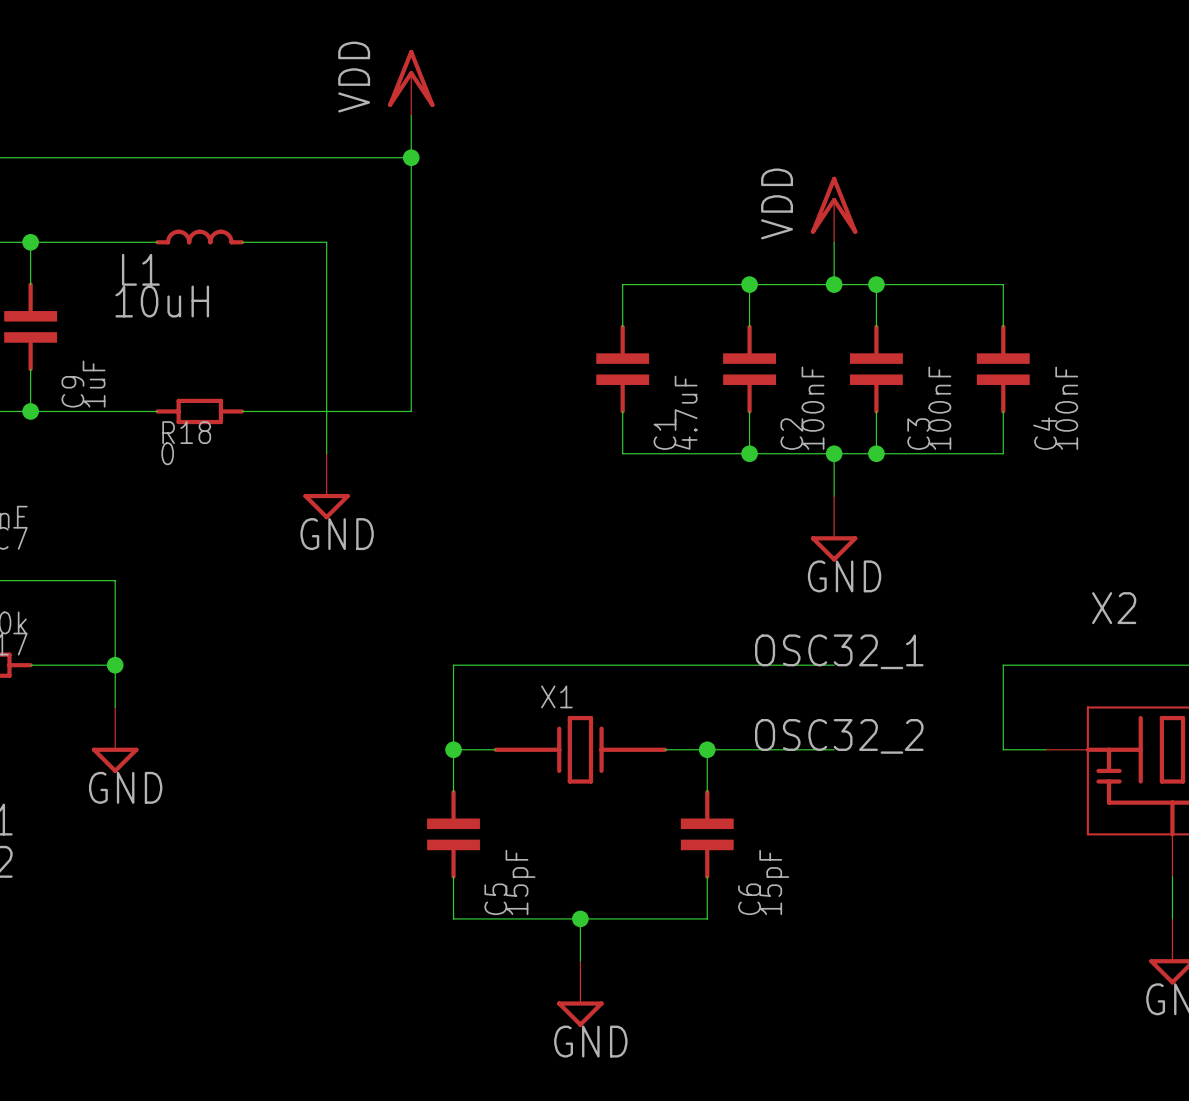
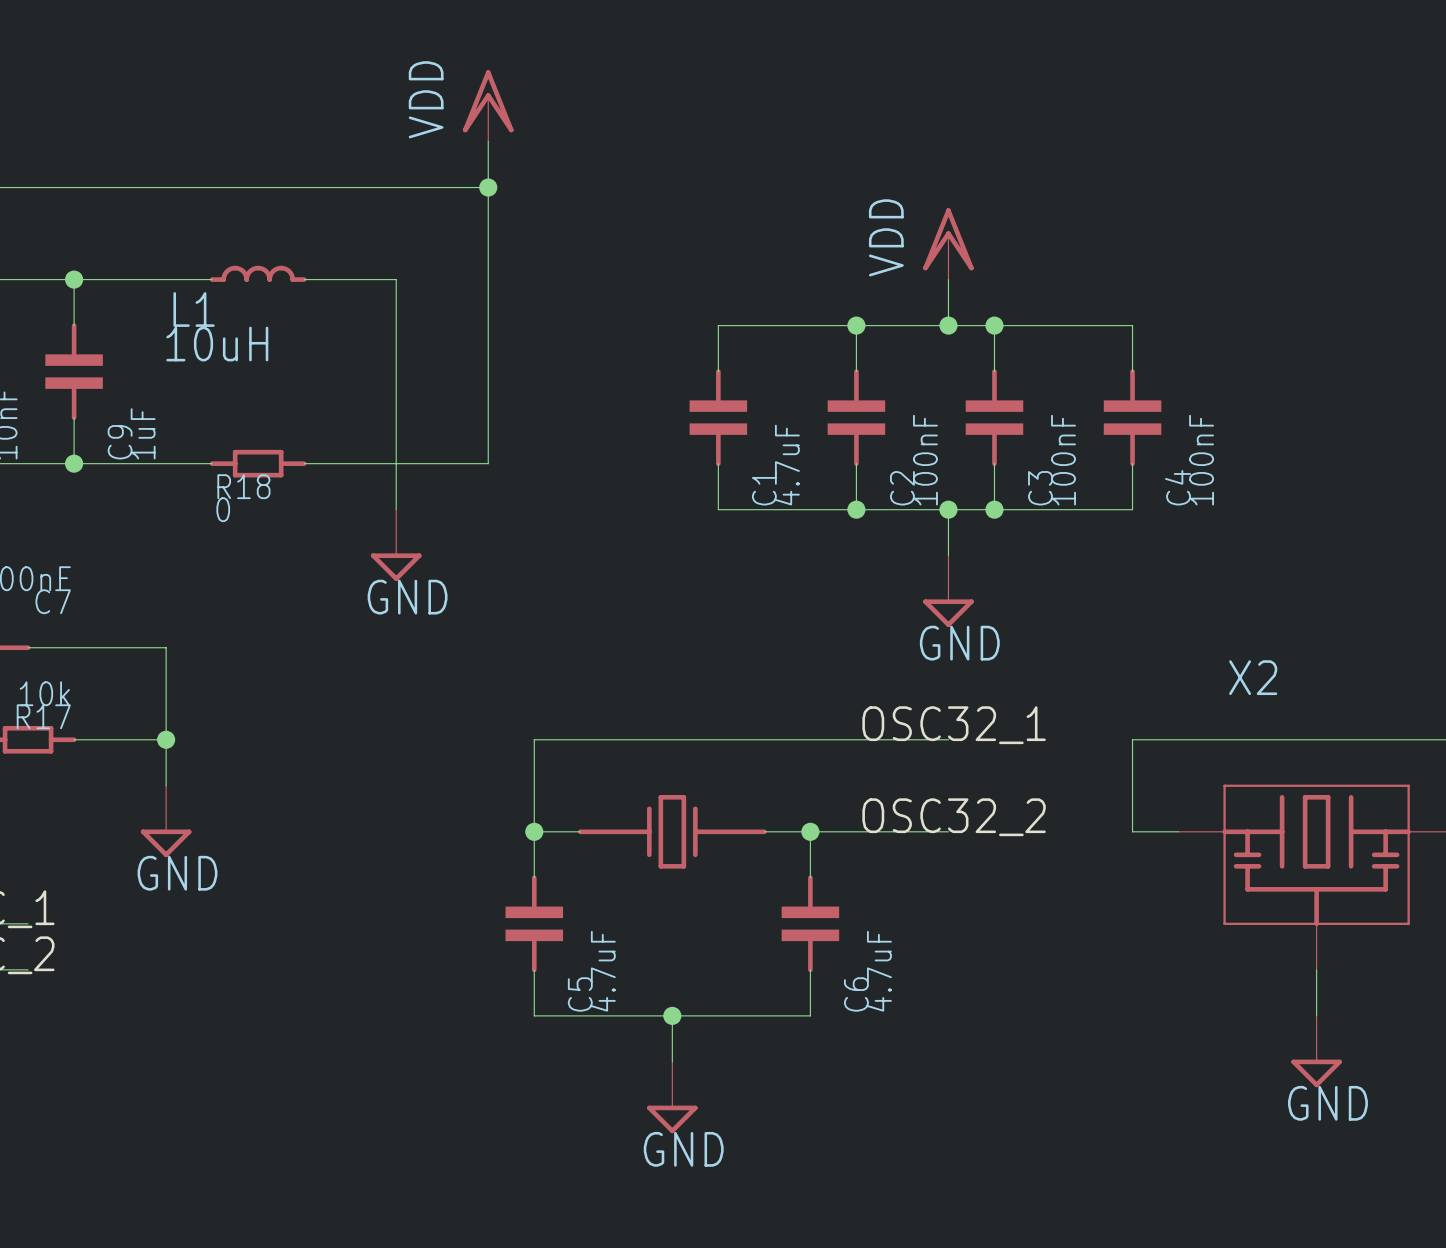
X1 name: X1 (556, 696) -> none
C5 value: 15pF (520, 882) -> 4.7uF (602, 971)
C6 value: 15pF (774, 882) -> 4.7uF (878, 971)

